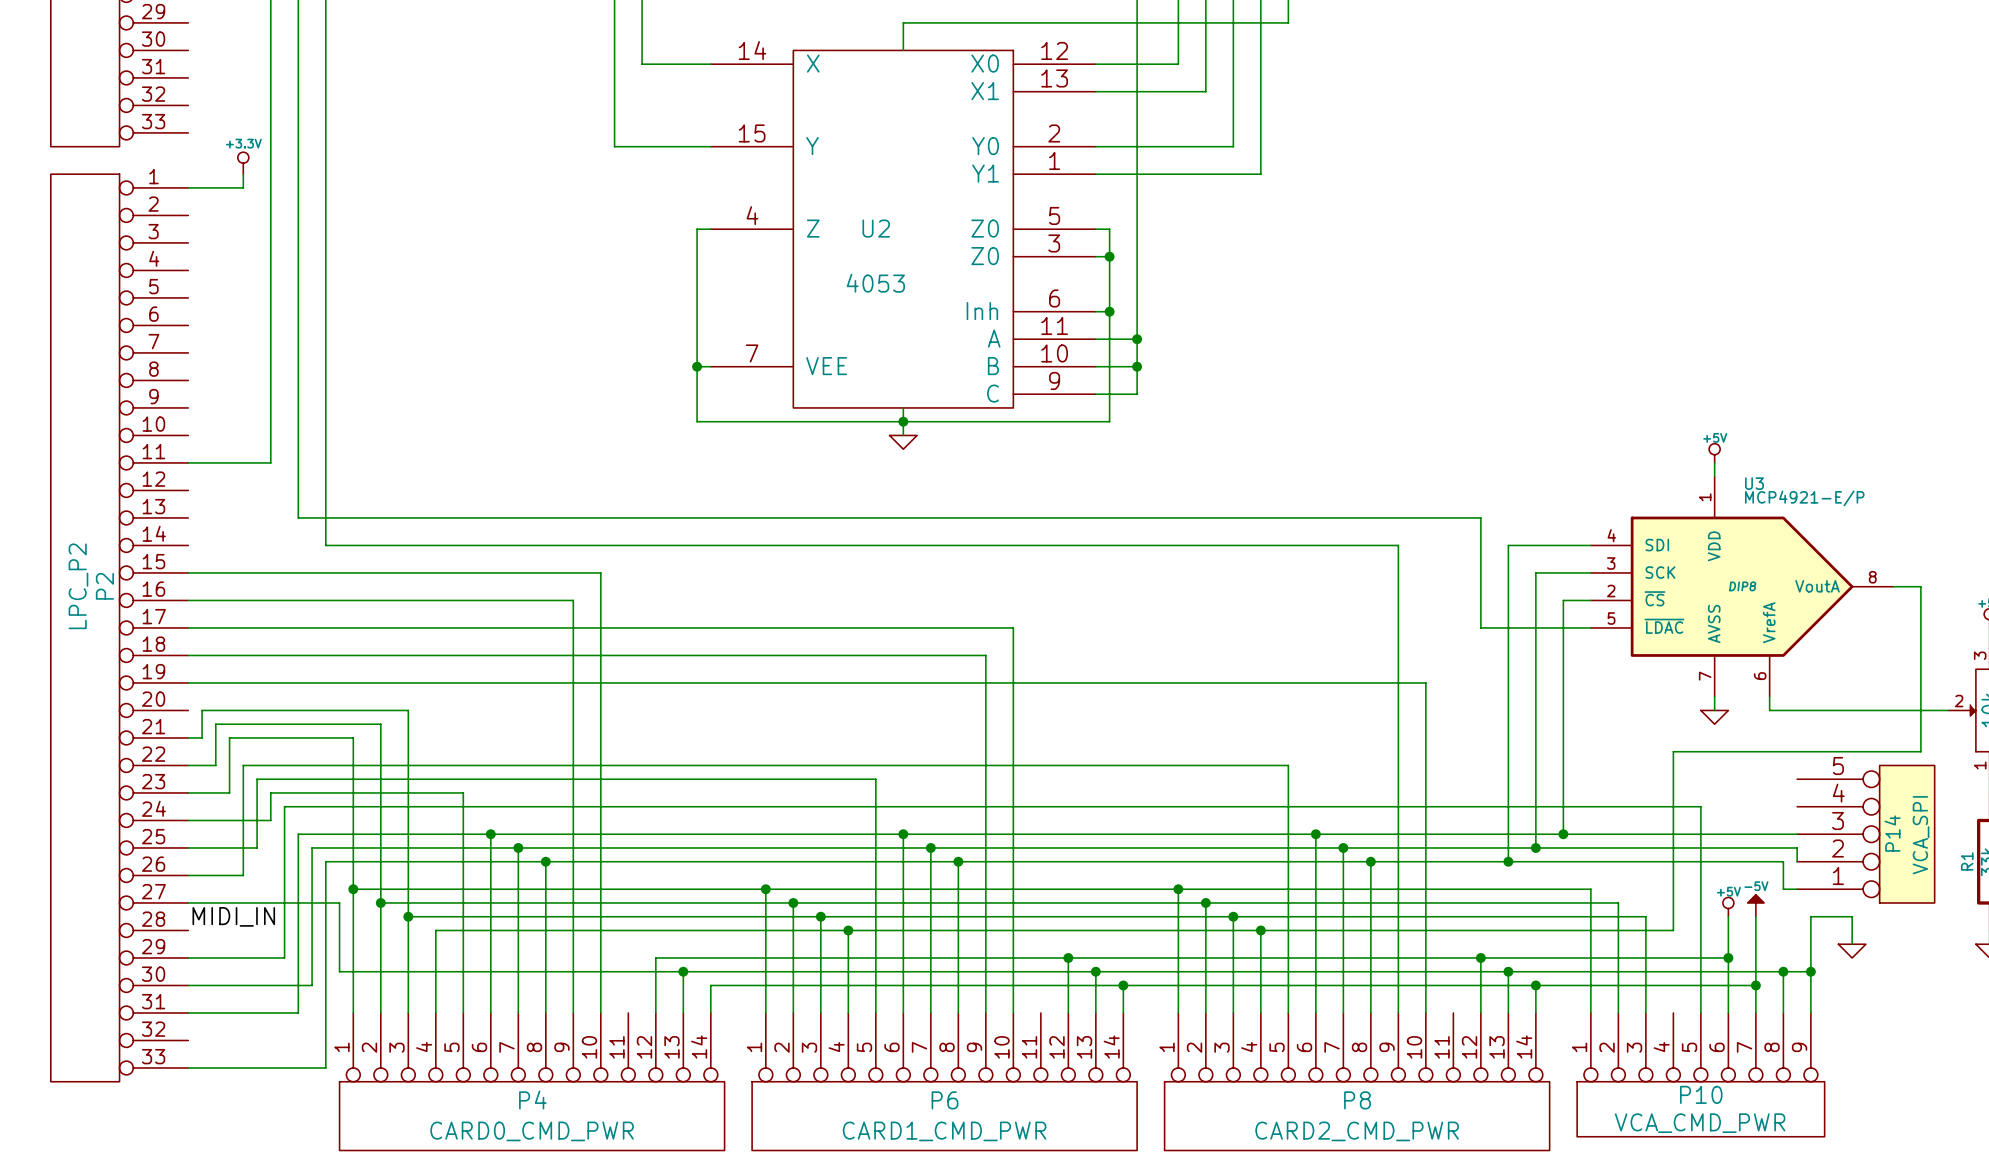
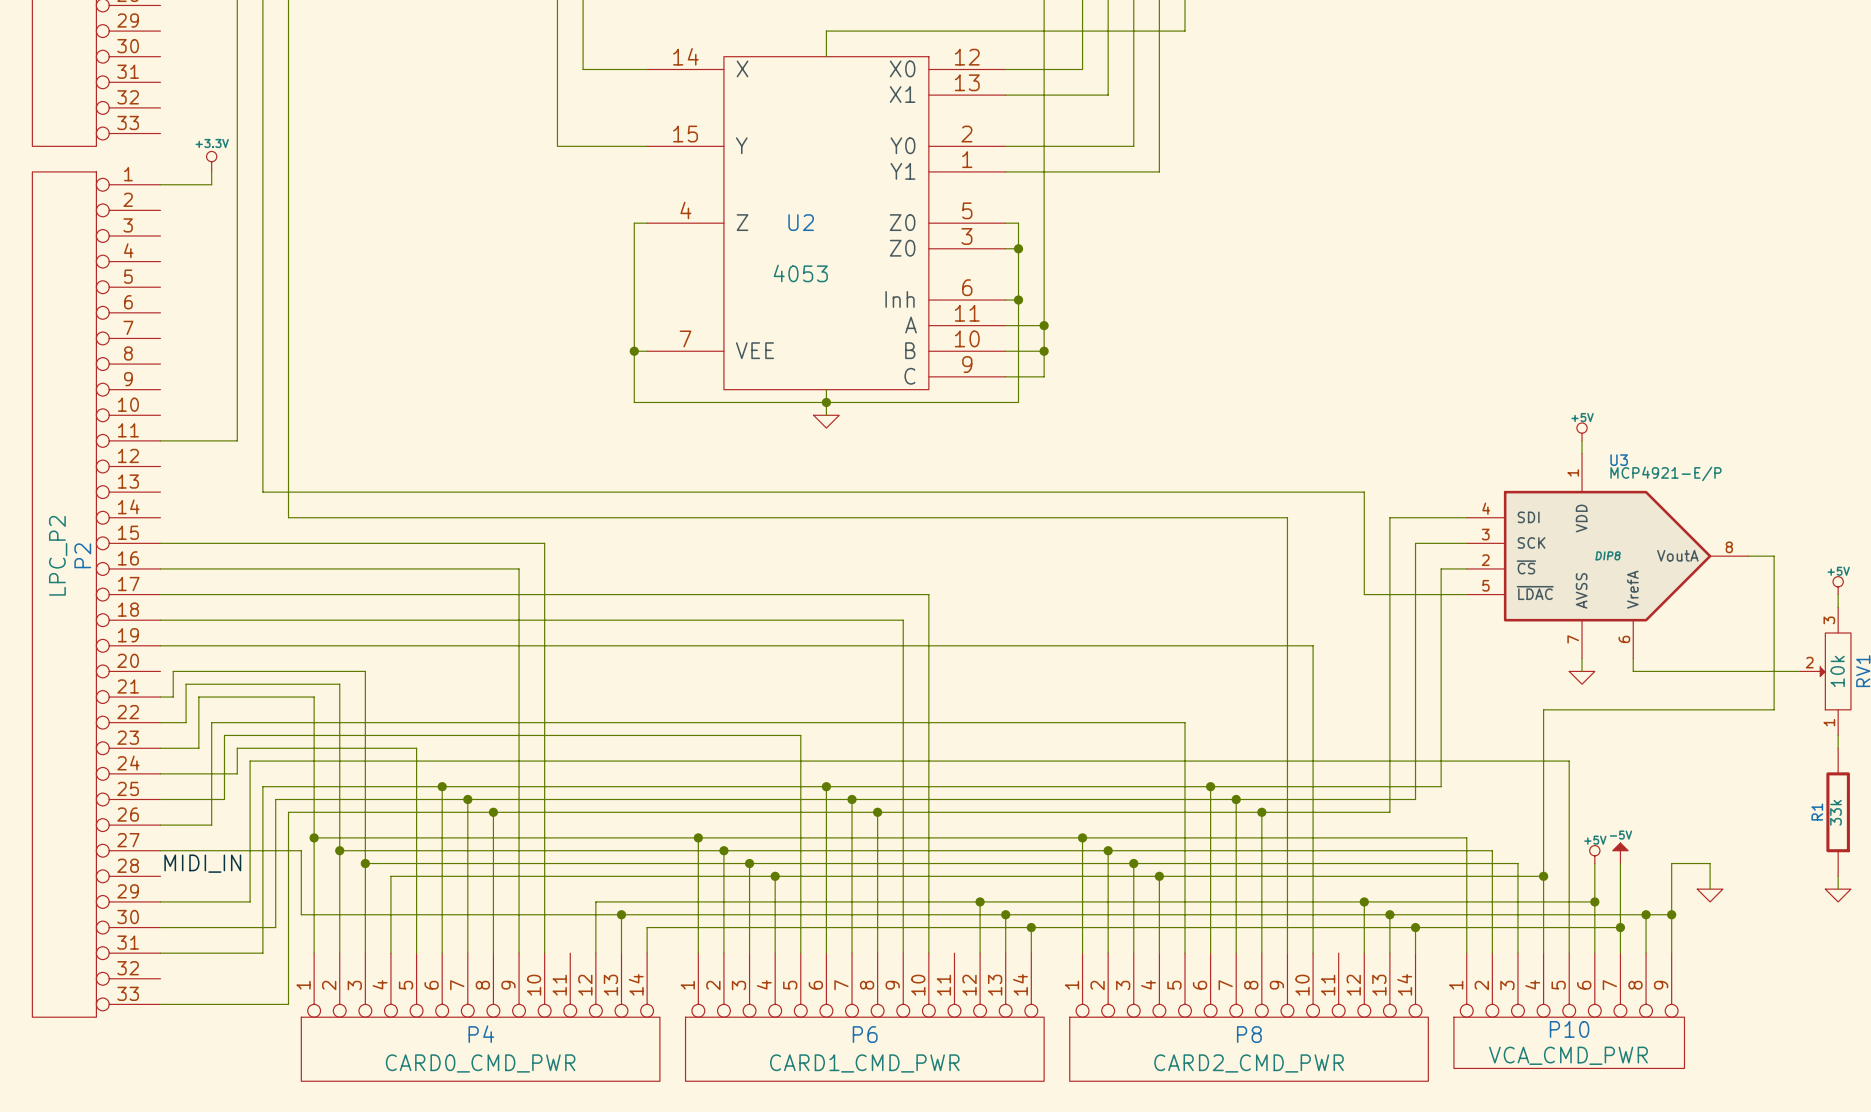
wire: (1563, 834) (1797, 834) -> none
junction: (1563, 834) -> none
P14: VCA_SPI (1865, 834) -> none
wire: (1535, 847) (1797, 847) (1797, 861) -> none
junction: (1535, 847) -> none
wire: (1508, 861) (1783, 861) (1783, 889) (1797, 889) -> none
junction: (1508, 861) -> none
wire: none -> (1543, 876) (1543, 953)
junction: none -> (1543, 876)

